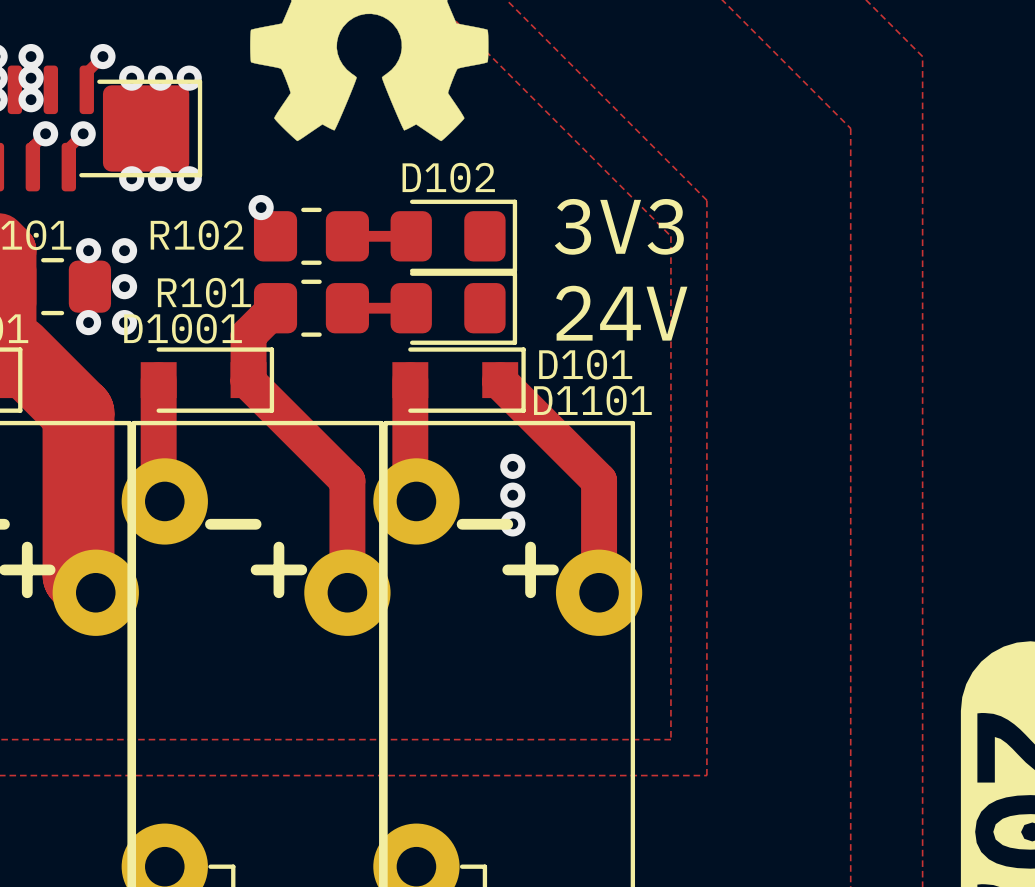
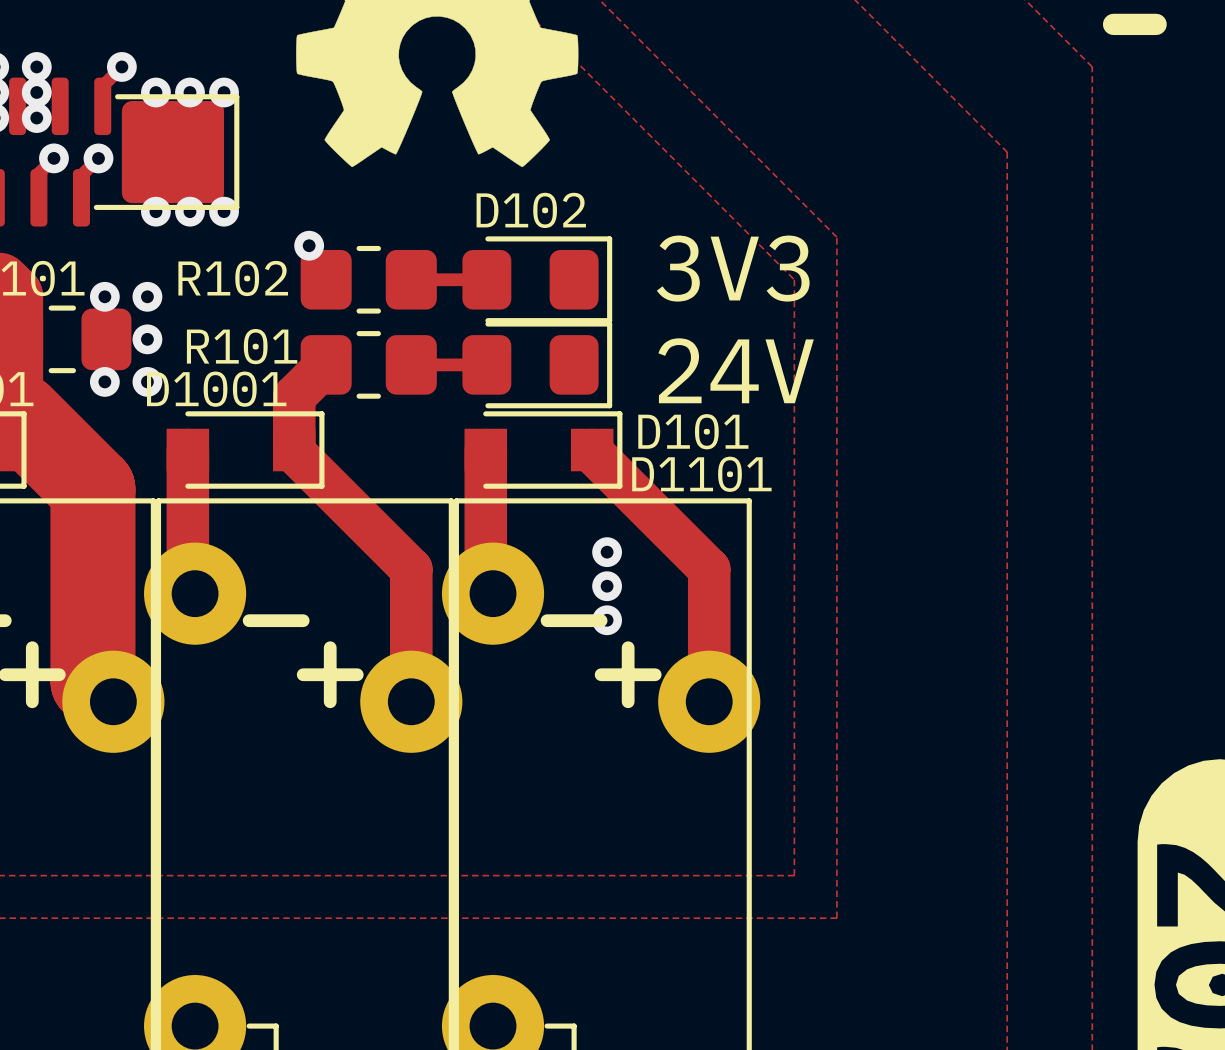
line: none -> (1113, 24) (1156, 24)

